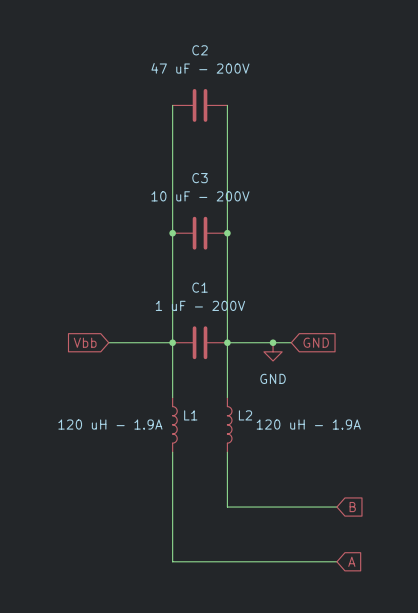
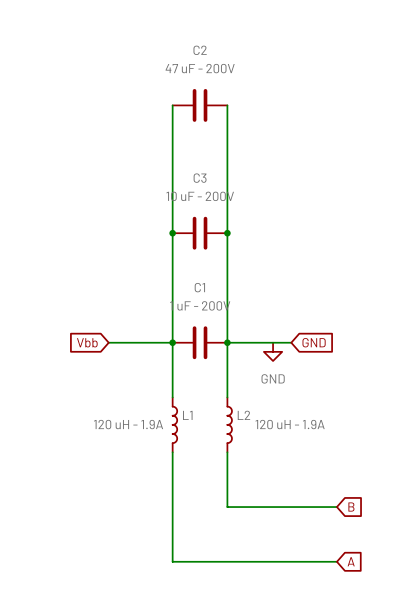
junction: (273, 342) -> none

